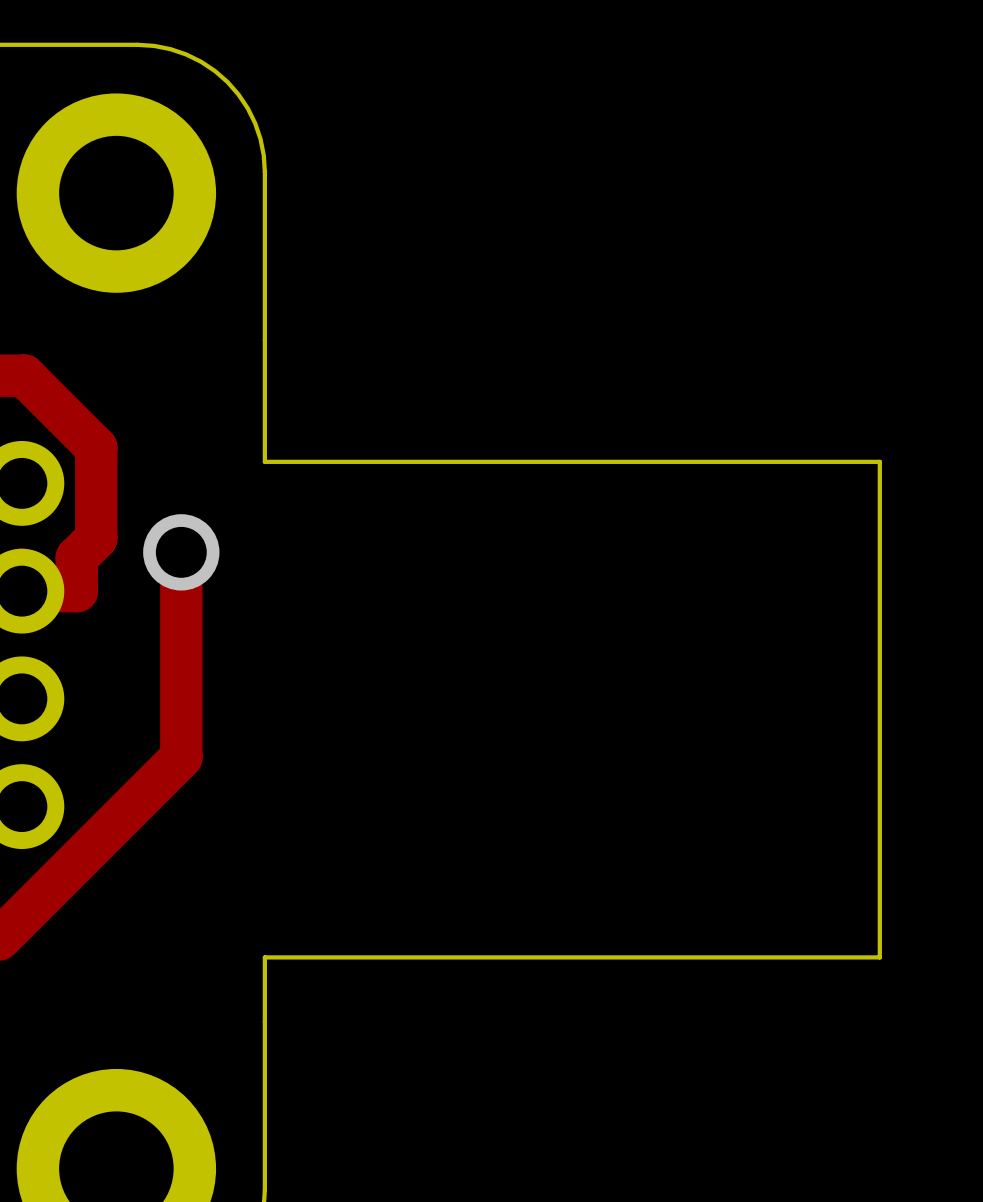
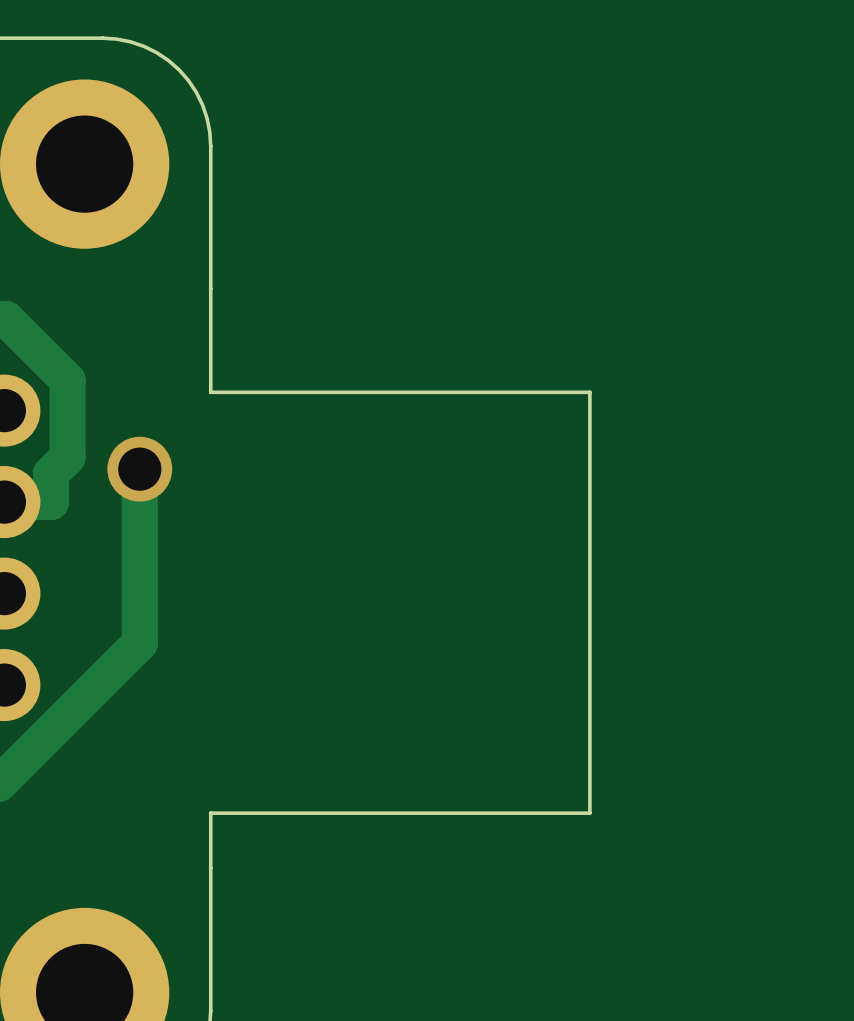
board edge: (711, 461) (879, 461) (879, 957) (711, 957) -> (589, 392) (589, 813)

